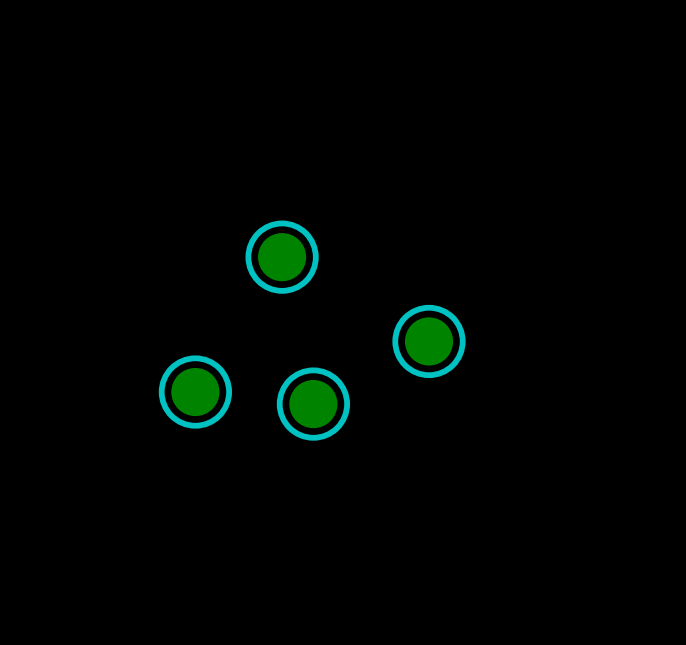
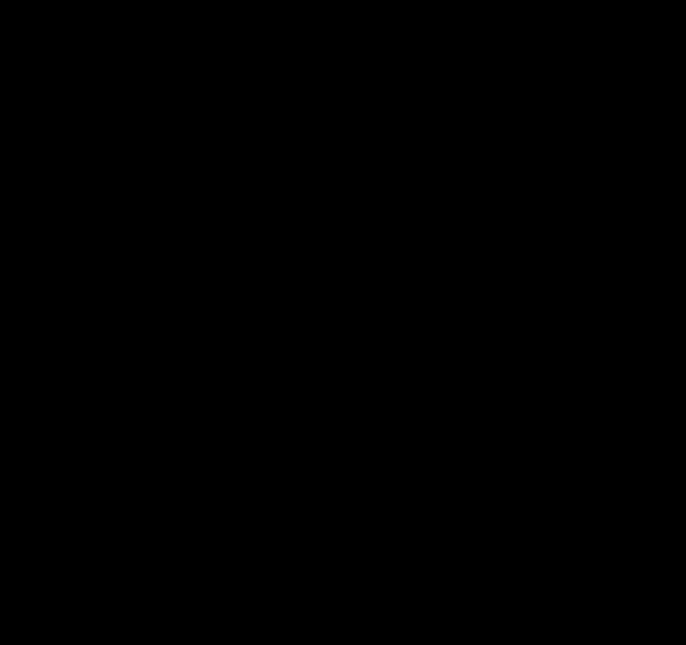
part: (282, 257) -> none
part: (428, 341) -> none
part: (195, 392) -> none
part: (313, 404) -> none

